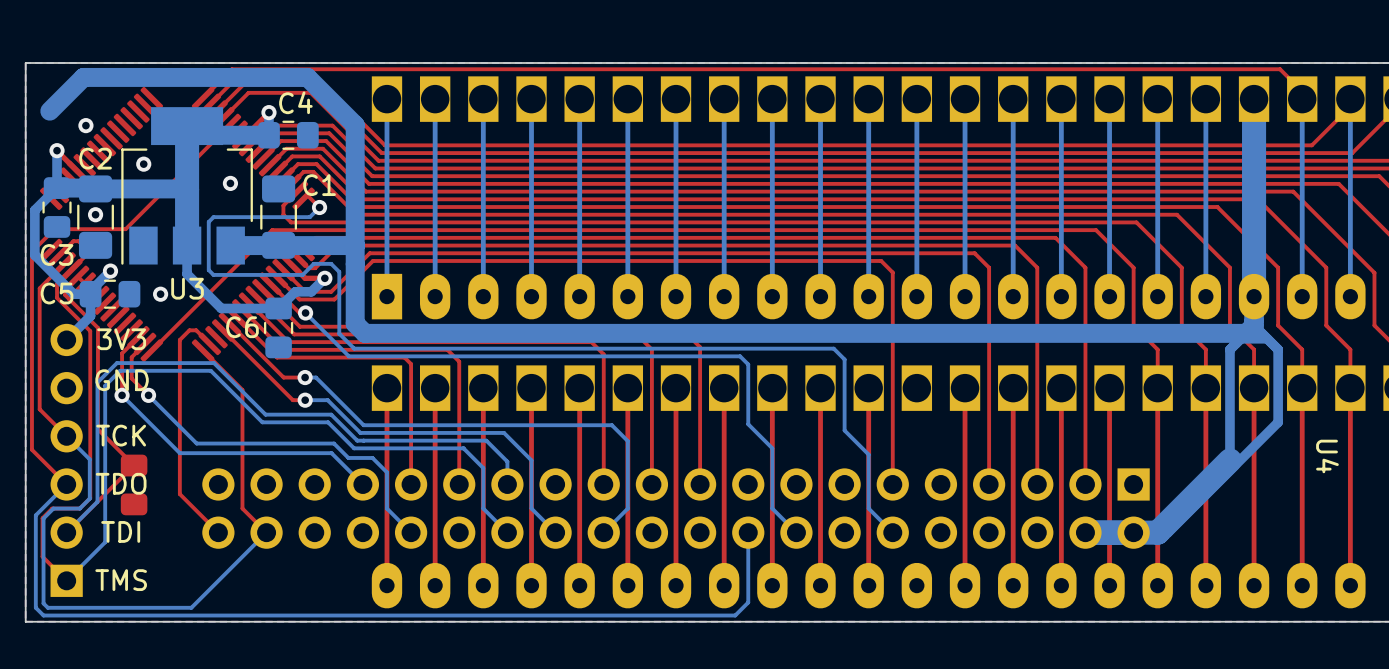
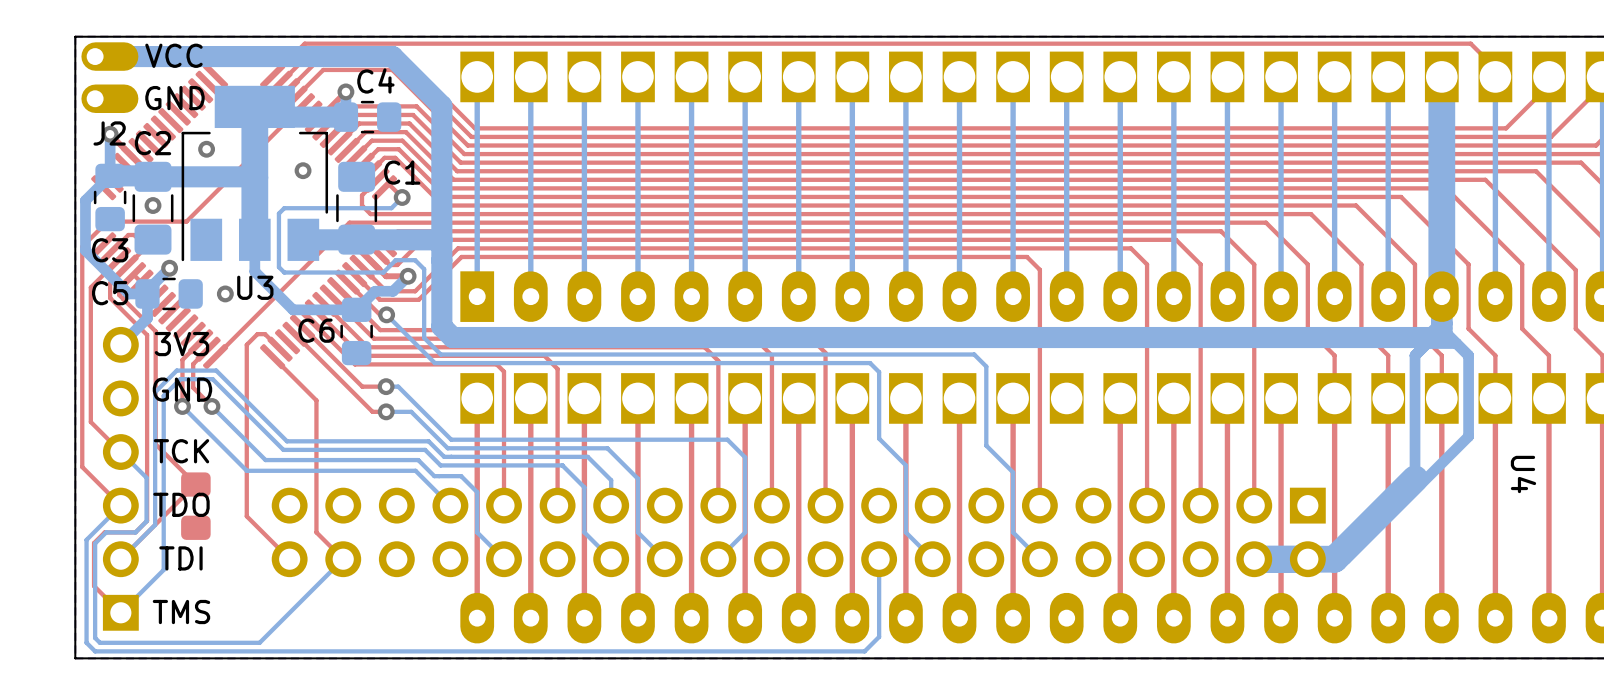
text: none -> VCC (173, 55)
bottom track: (310, 80) (307, 77) (83, 77) (49, 111) -> (392, 56) (95, 56)
J2: none -> (109, 77)
text: none -> GND (174, 98)
via: (85, 125) -> none
bottom track: (152, 363) (214, 363) (265, 414) (331, 414) (343, 426) -> (216, 370) (286, 441) (428, 441)
bottom track: (149, 370) (210, 370) (262, 422) (328, 422) (340, 434) -> (212, 379) (283, 449) (425, 449)

